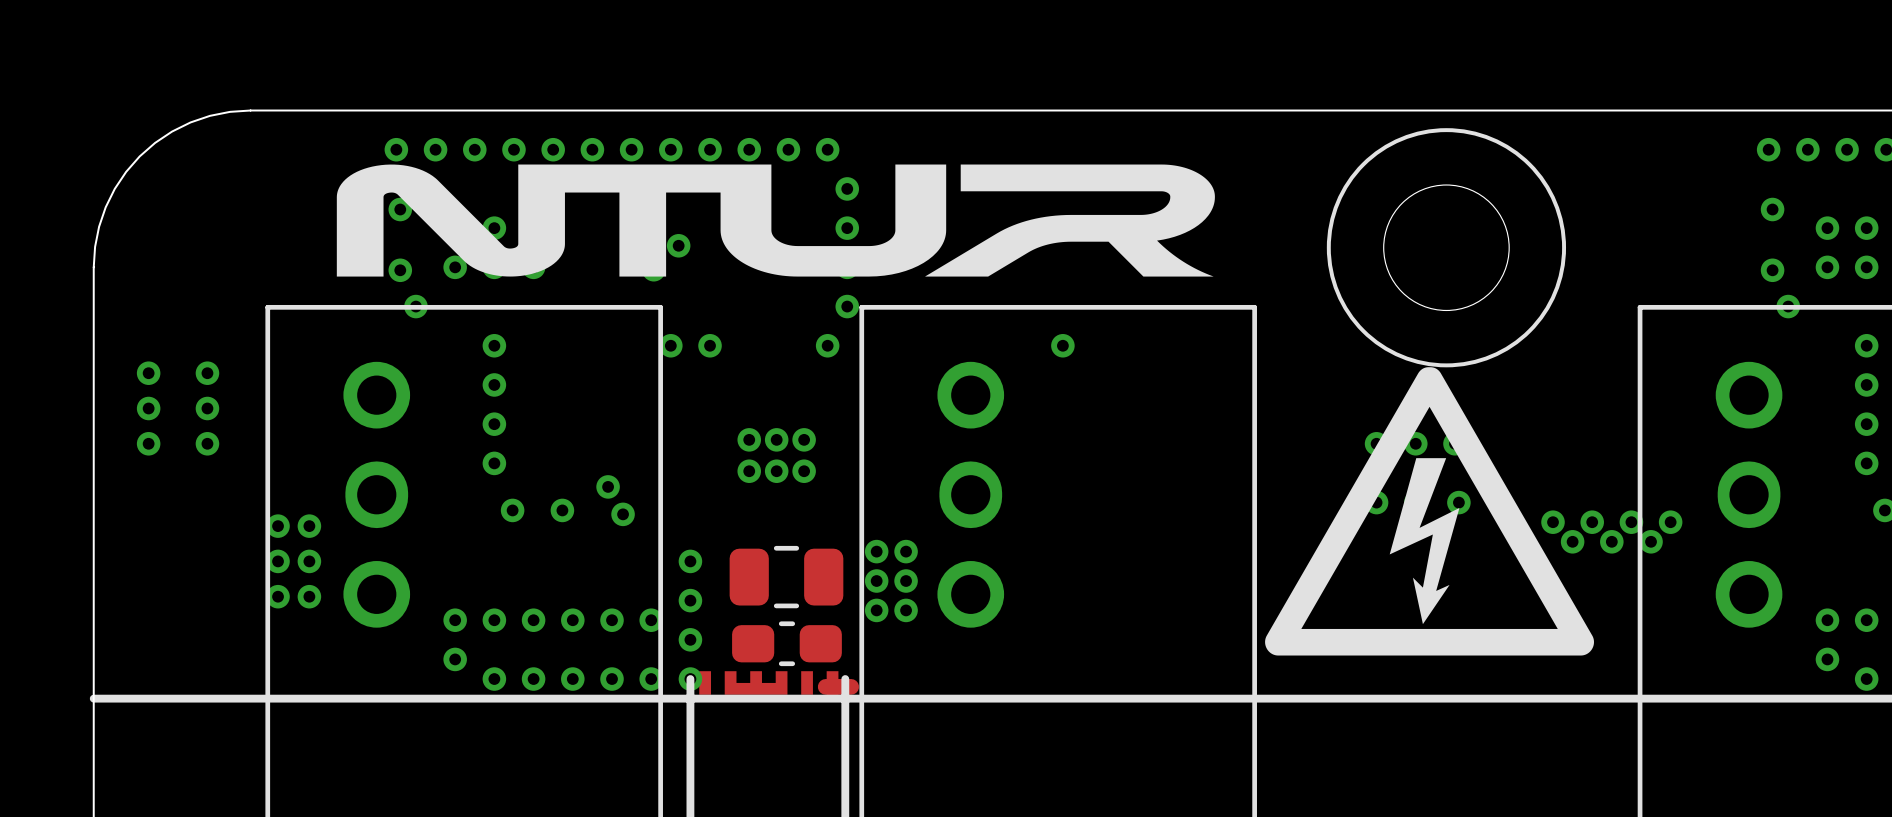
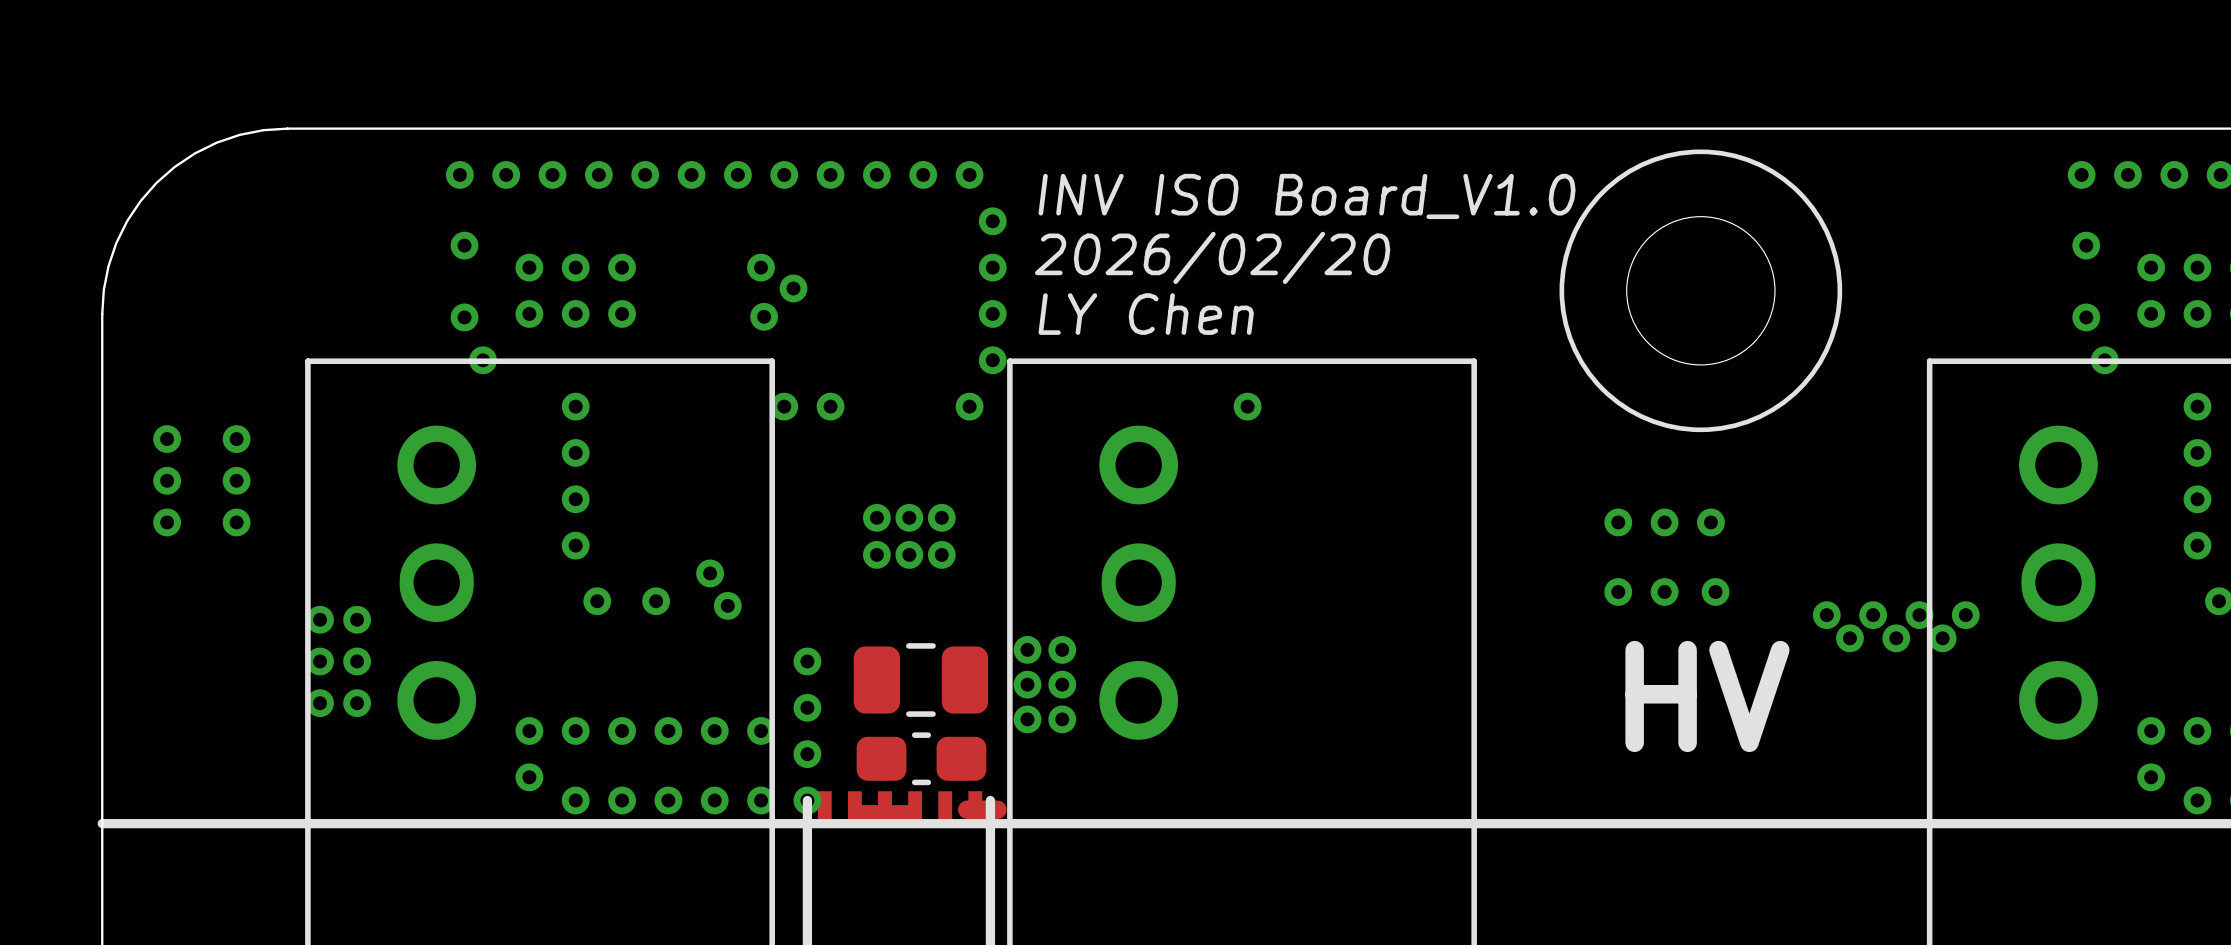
drawing: [336, 164, 1215, 277] -> none
text: none -> INV ISO Board_V1.0 (1307, 196)
text: none -> 2026/02/20 (1212, 257)
text: none -> LY Chen (1146, 314)
drawing: [1265, 367, 1594, 656] -> none
text: none -> HV (1707, 696)

